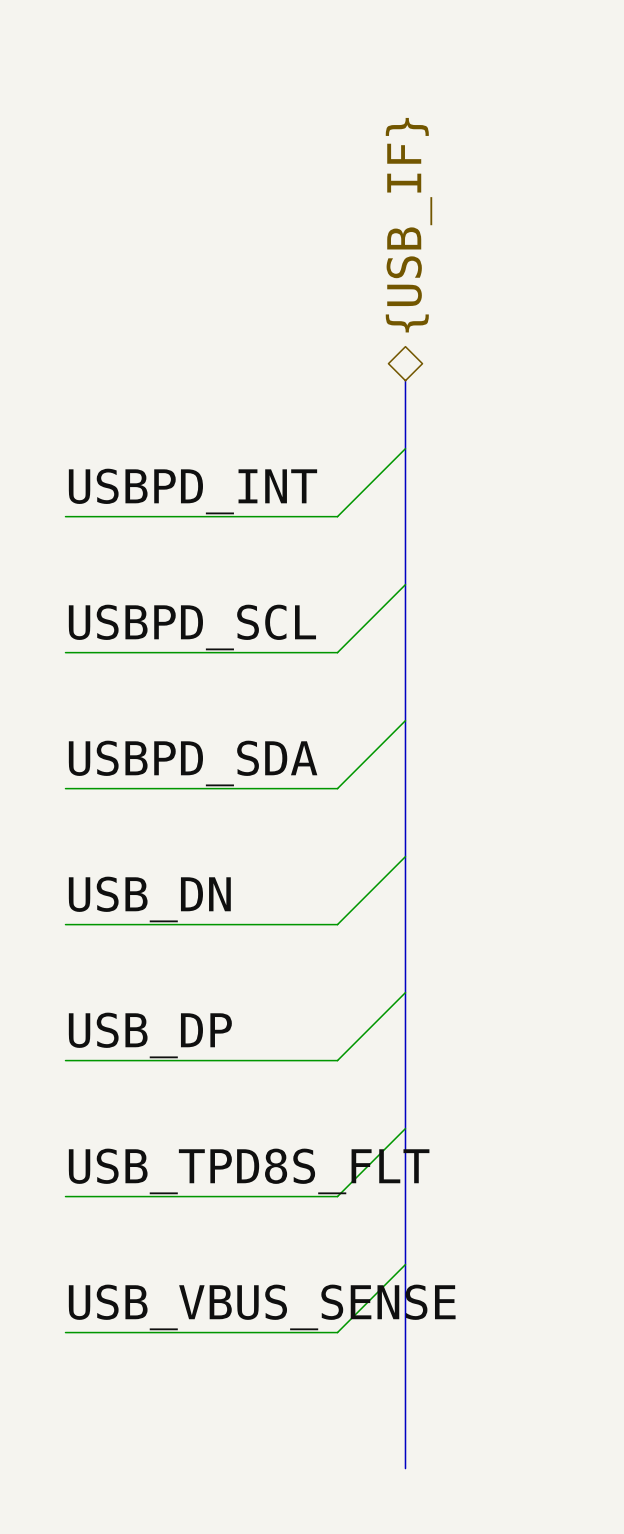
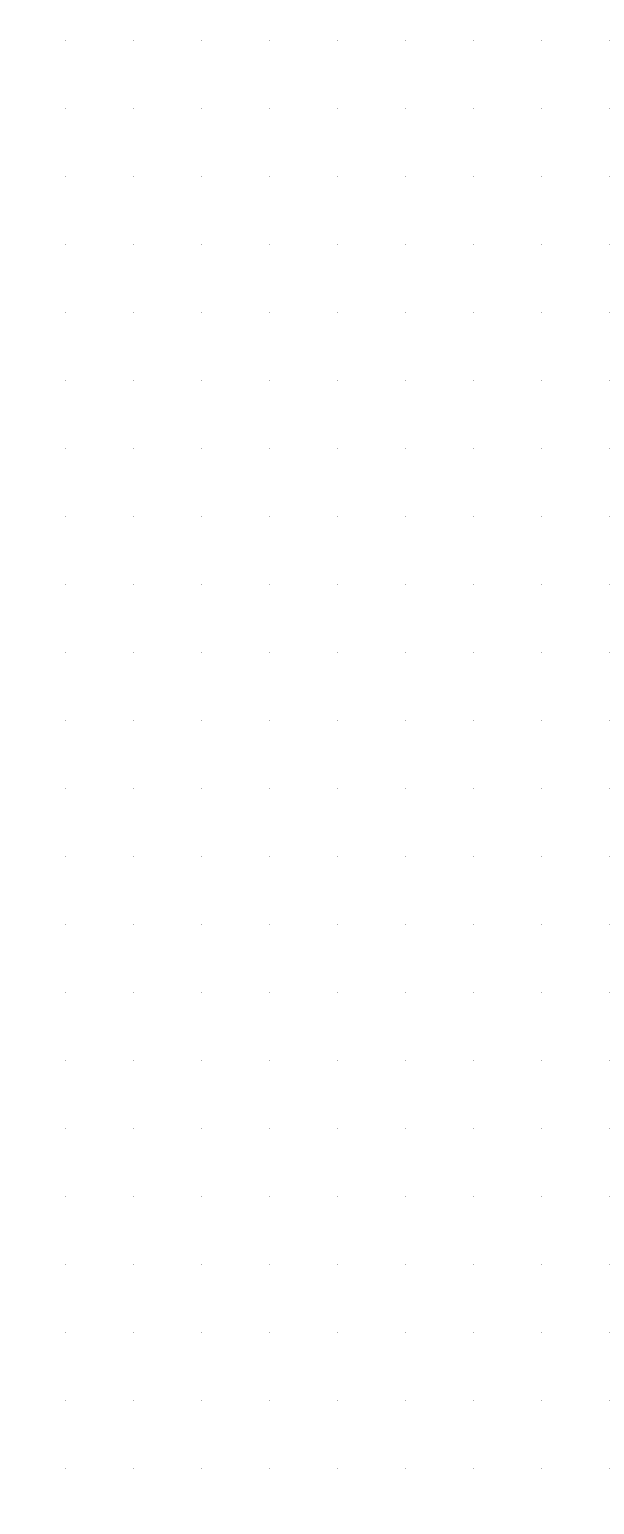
hierarchical label: {USB_IF} (408, 225) -> none
bus: (405, 380) (405, 1468) -> none
wire: (405, 448) (337, 516) (65, 516) -> none
label: USBPD_INT (192, 491) -> none
wire: (405, 584) (337, 652) (65, 652) -> none
label: USBPD_SCL (192, 627) -> none
wire: (405, 720) (337, 788) (65, 788) -> none
label: USBPD_SDA (193, 763) -> none
wire: (405, 856) (337, 924) (65, 924) -> none
label: USB_DN (149, 899) -> none
wire: (405, 992) (337, 1060) (65, 1060) -> none
label: USB_DP (150, 1035) -> none
wire: (405, 1128) (337, 1196) (65, 1196) -> none
label: USB_TPD8S_FLT (249, 1171) -> none
wire: (405, 1264) (337, 1332) (65, 1332) -> none
label: USB_VBUS_SENSE (262, 1307) -> none

